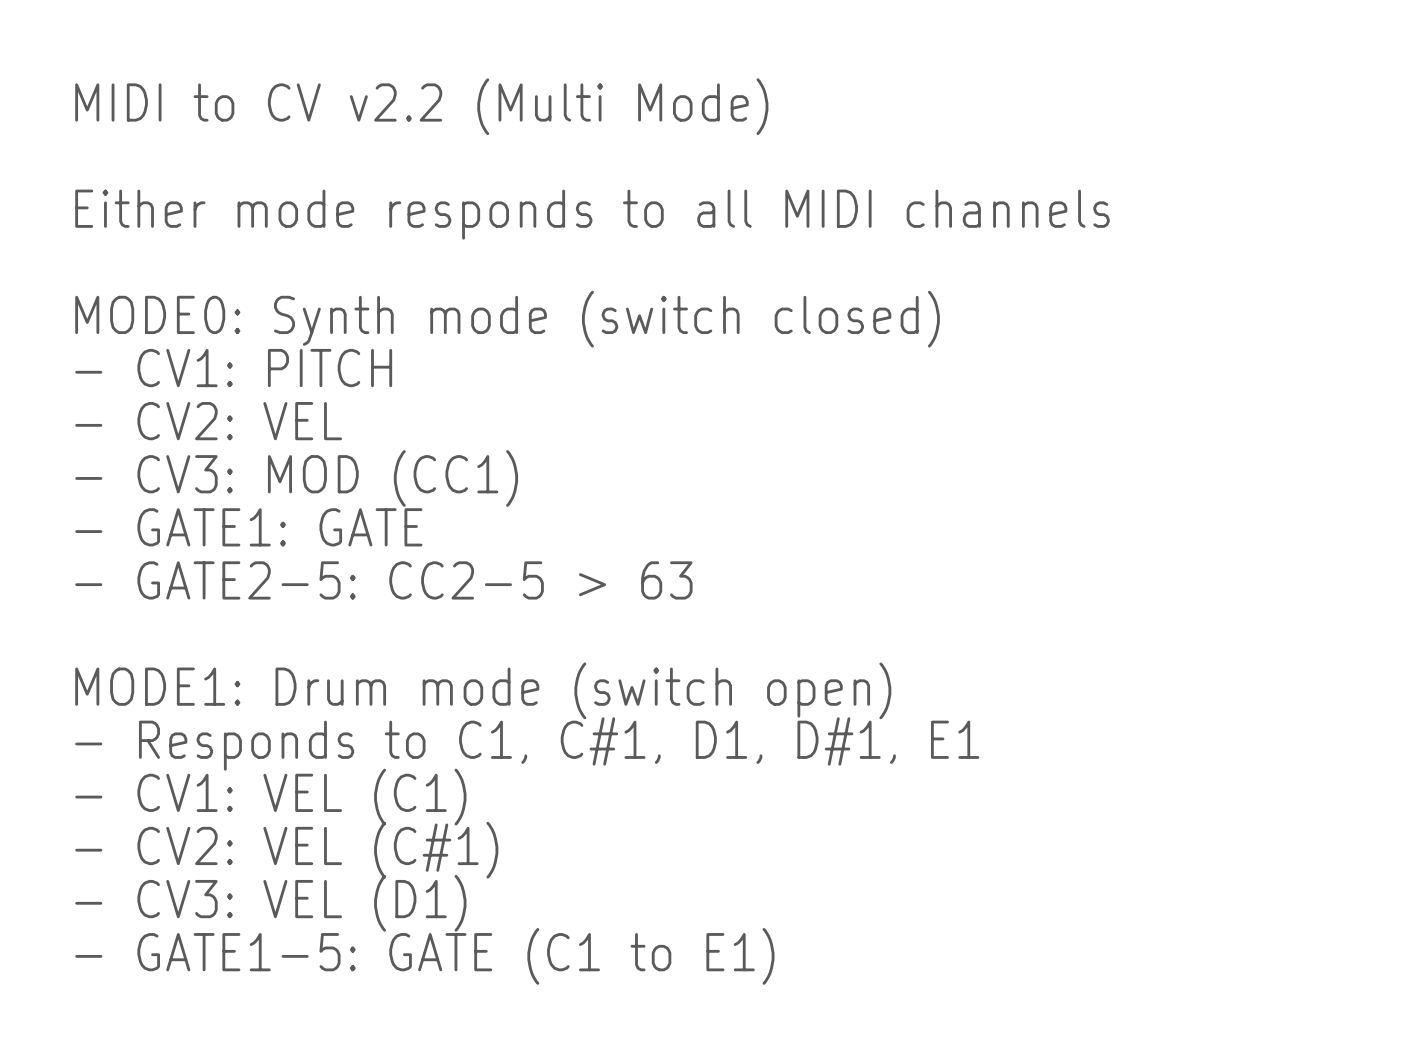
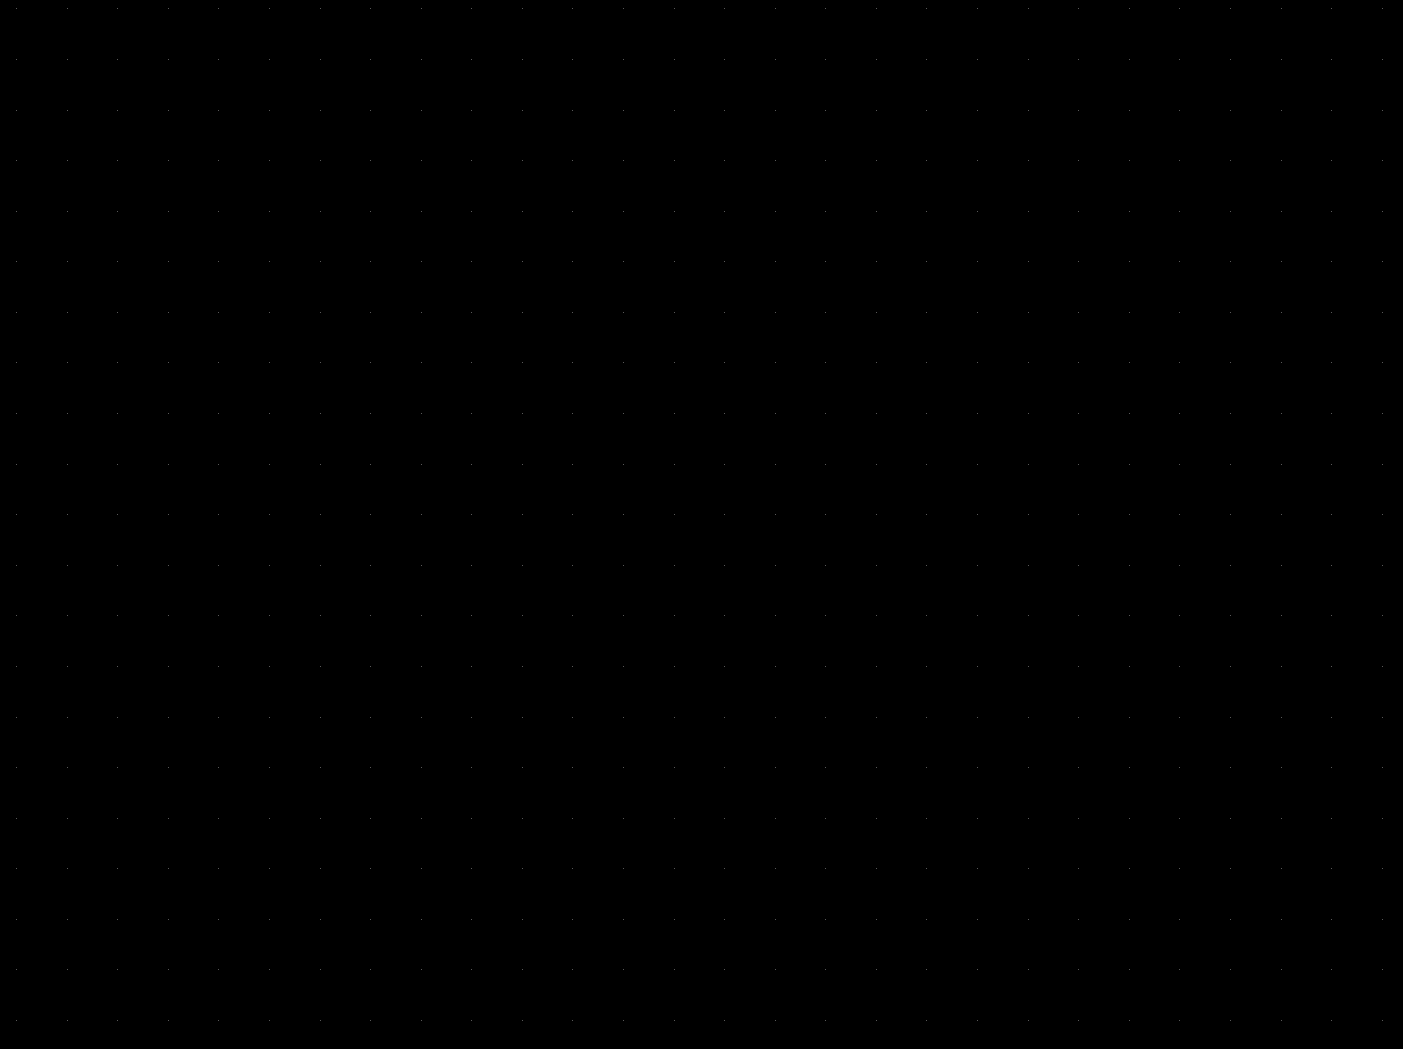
text: MIDI to CV v2.2 (Multi Mode) (421, 106) -> none
text: Either mode responds to all MIDI channels (592, 214) -> none
text: MODE0: Synth mode (switch closed) (507, 319) -> none
text: - CV1: PITCH (233, 368) -> none
text: - CV2: VEL (208, 421) -> none
text: - CV3: MOD (CC1) (296, 478) -> none
text: - GATE1: GATE (248, 527) -> none
text: - GATE2-5: CC2-5 > 63 (383, 580) -> none
text: MODE1: Drum mode (switch open) (483, 690) -> none
text: - Responds to C1, C#1, D1, D#1, E1 (527, 743) -> none
text: - CV1: VEL (C1) (270, 797) -> none
text: - CV2: VEL (C#1) (286, 850) -> none
text: - CV3: VEL (D1) (270, 903) -> none
text: - GATE1-5: GATE (C1 to E1) (424, 956) -> none

